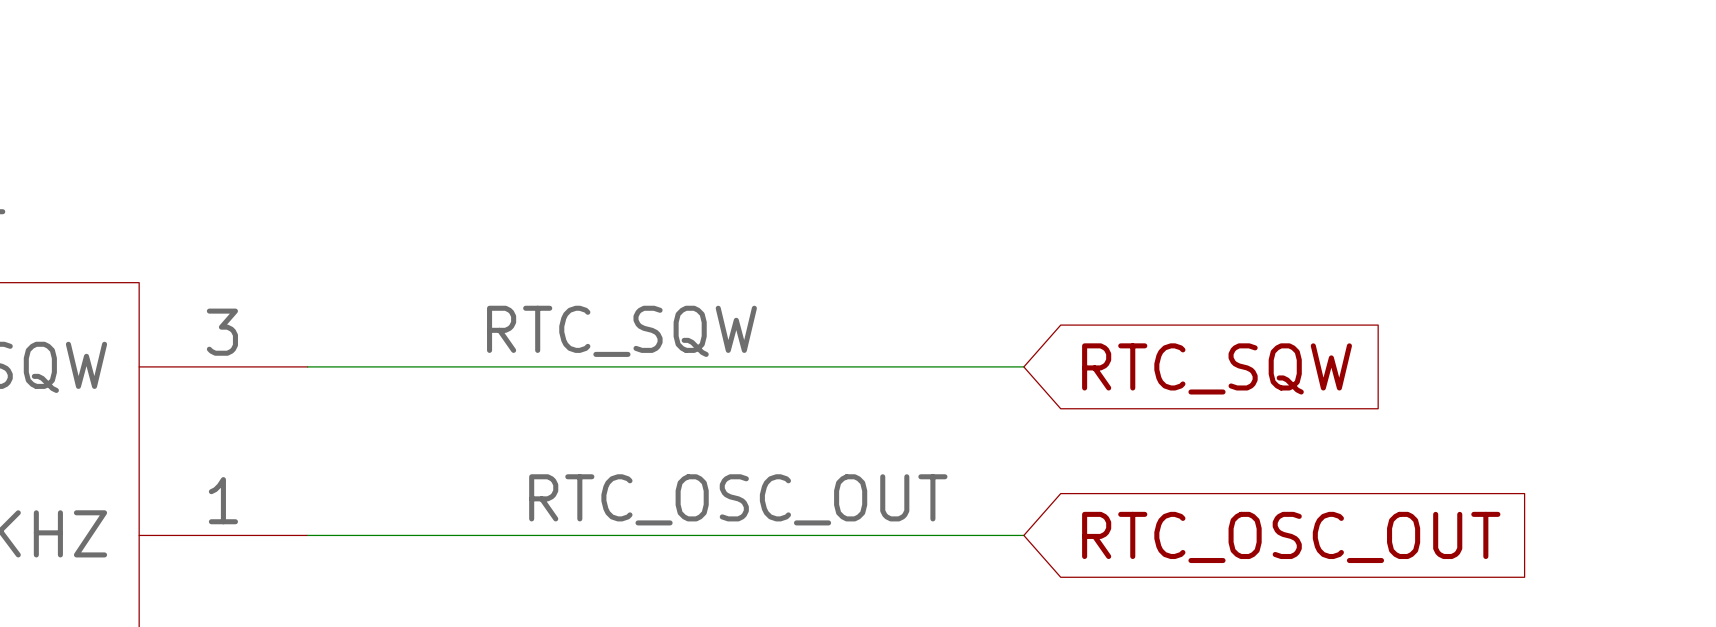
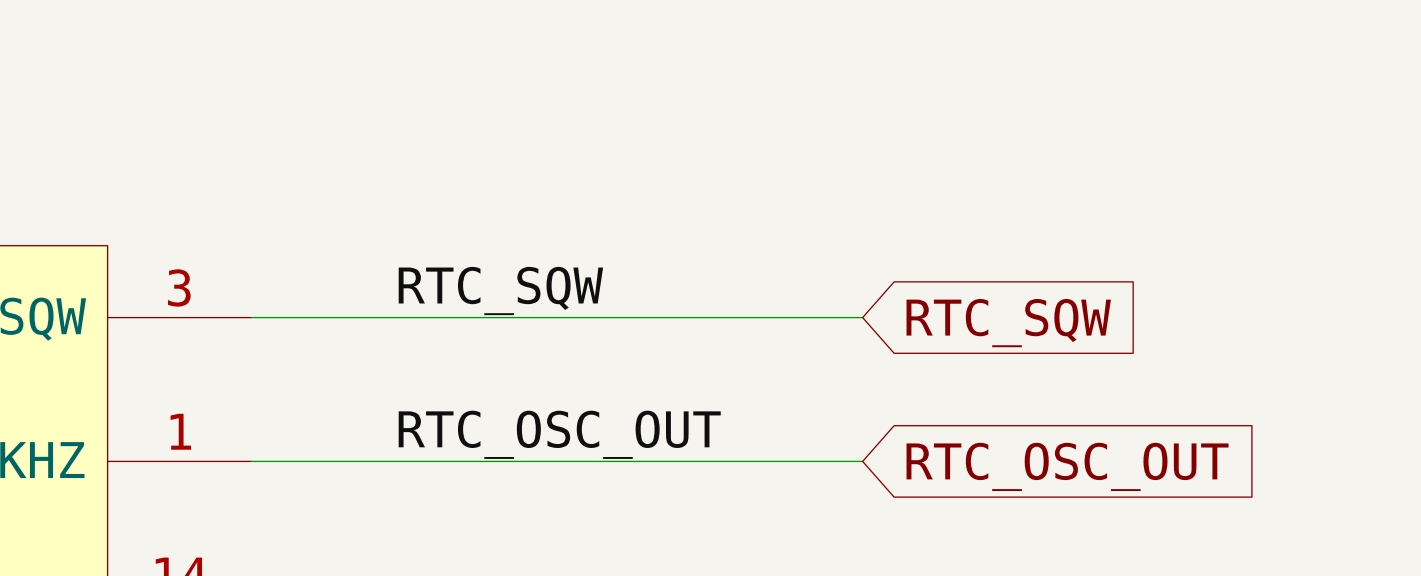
label position: RTC_OSC_OUT (738, 499) -> RTC_OSC_OUT (559, 434)

